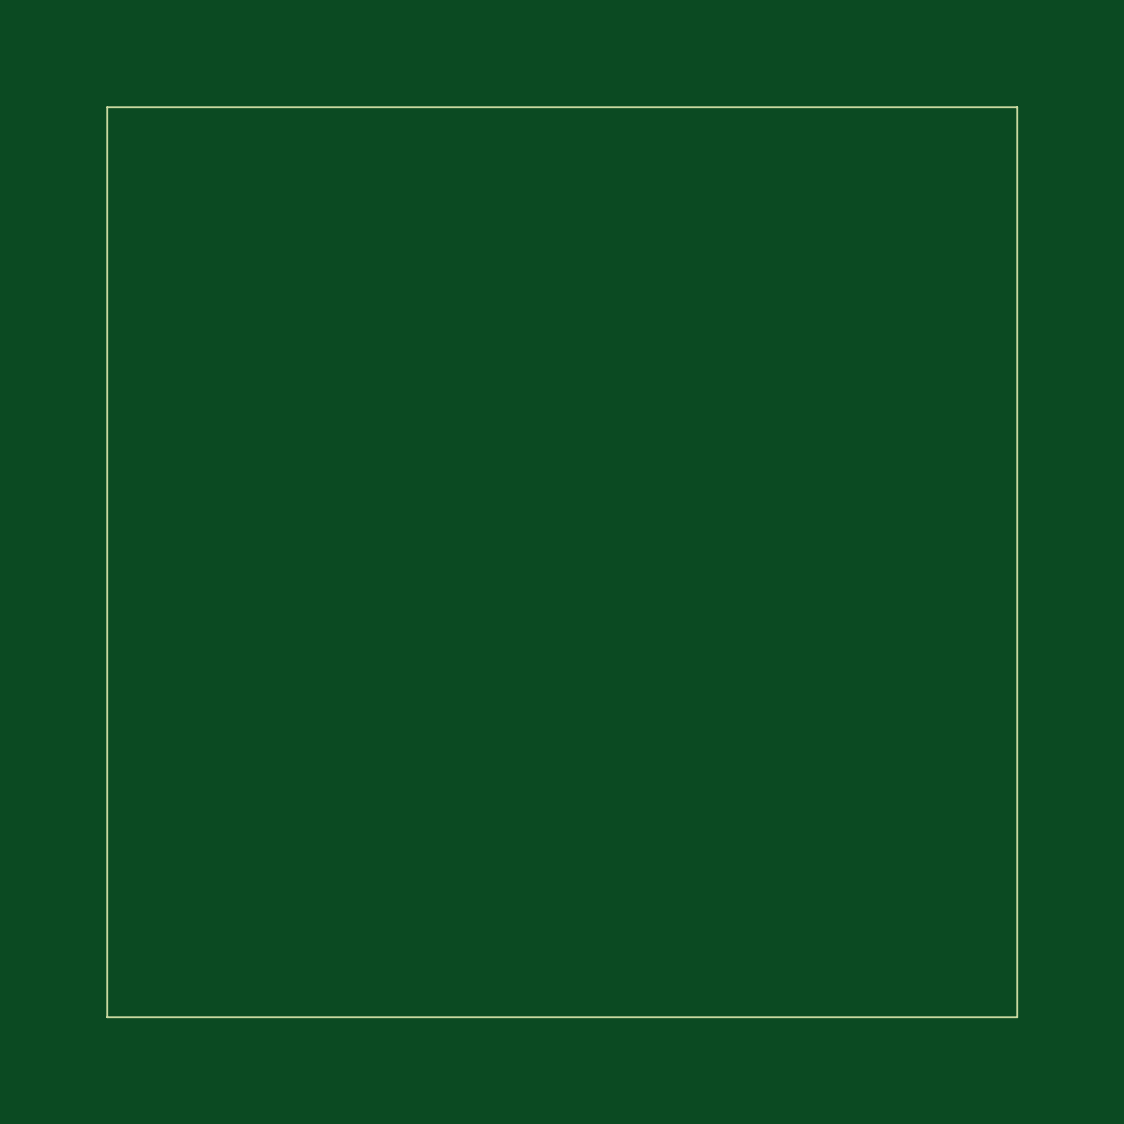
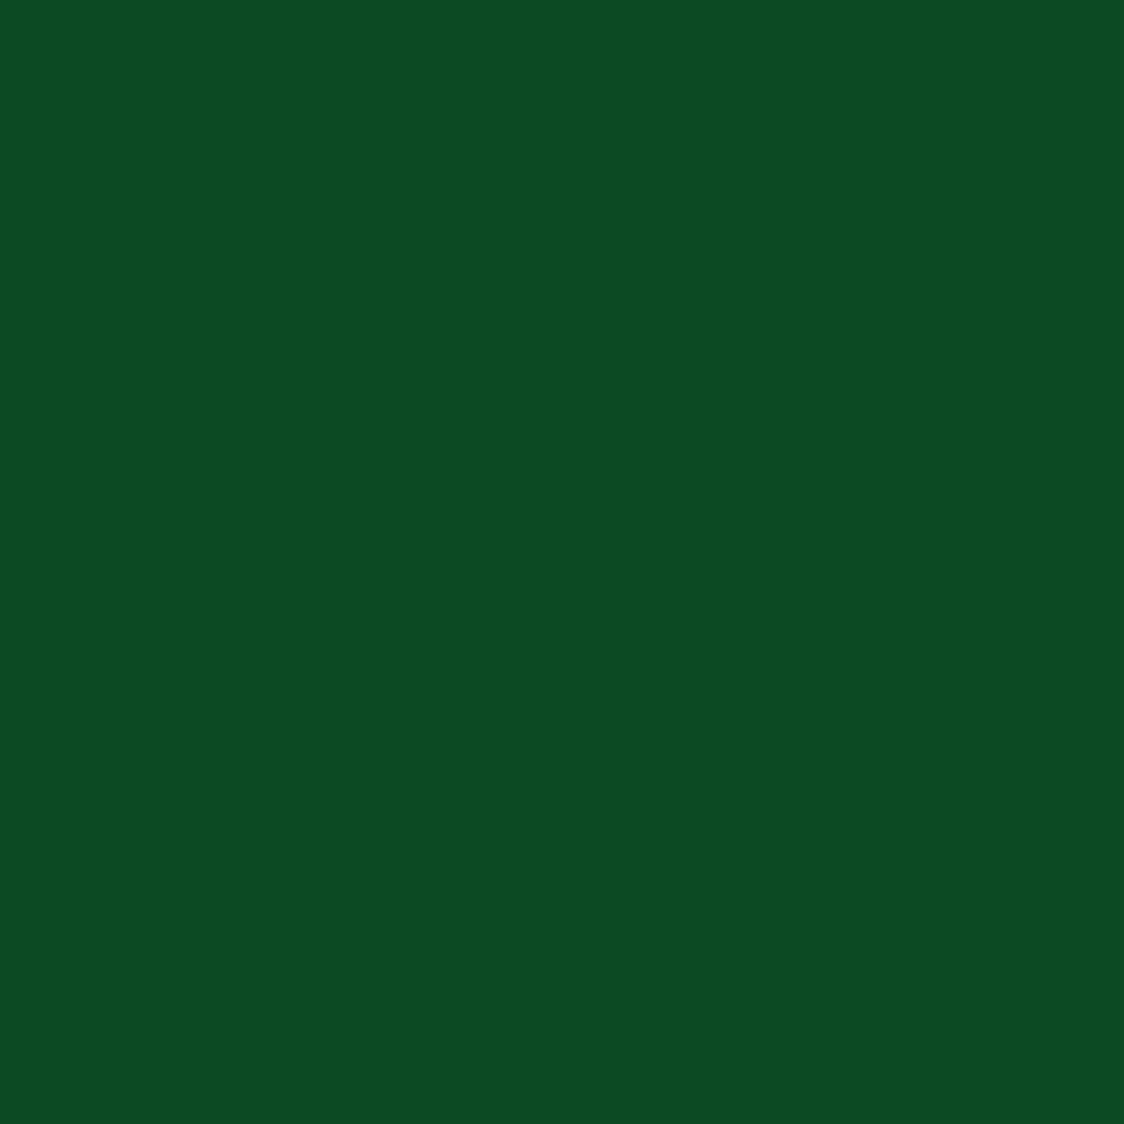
board edge: (1017, 107) (107, 107) (107, 1017) (1017, 1017) (1017, 107) -> none

